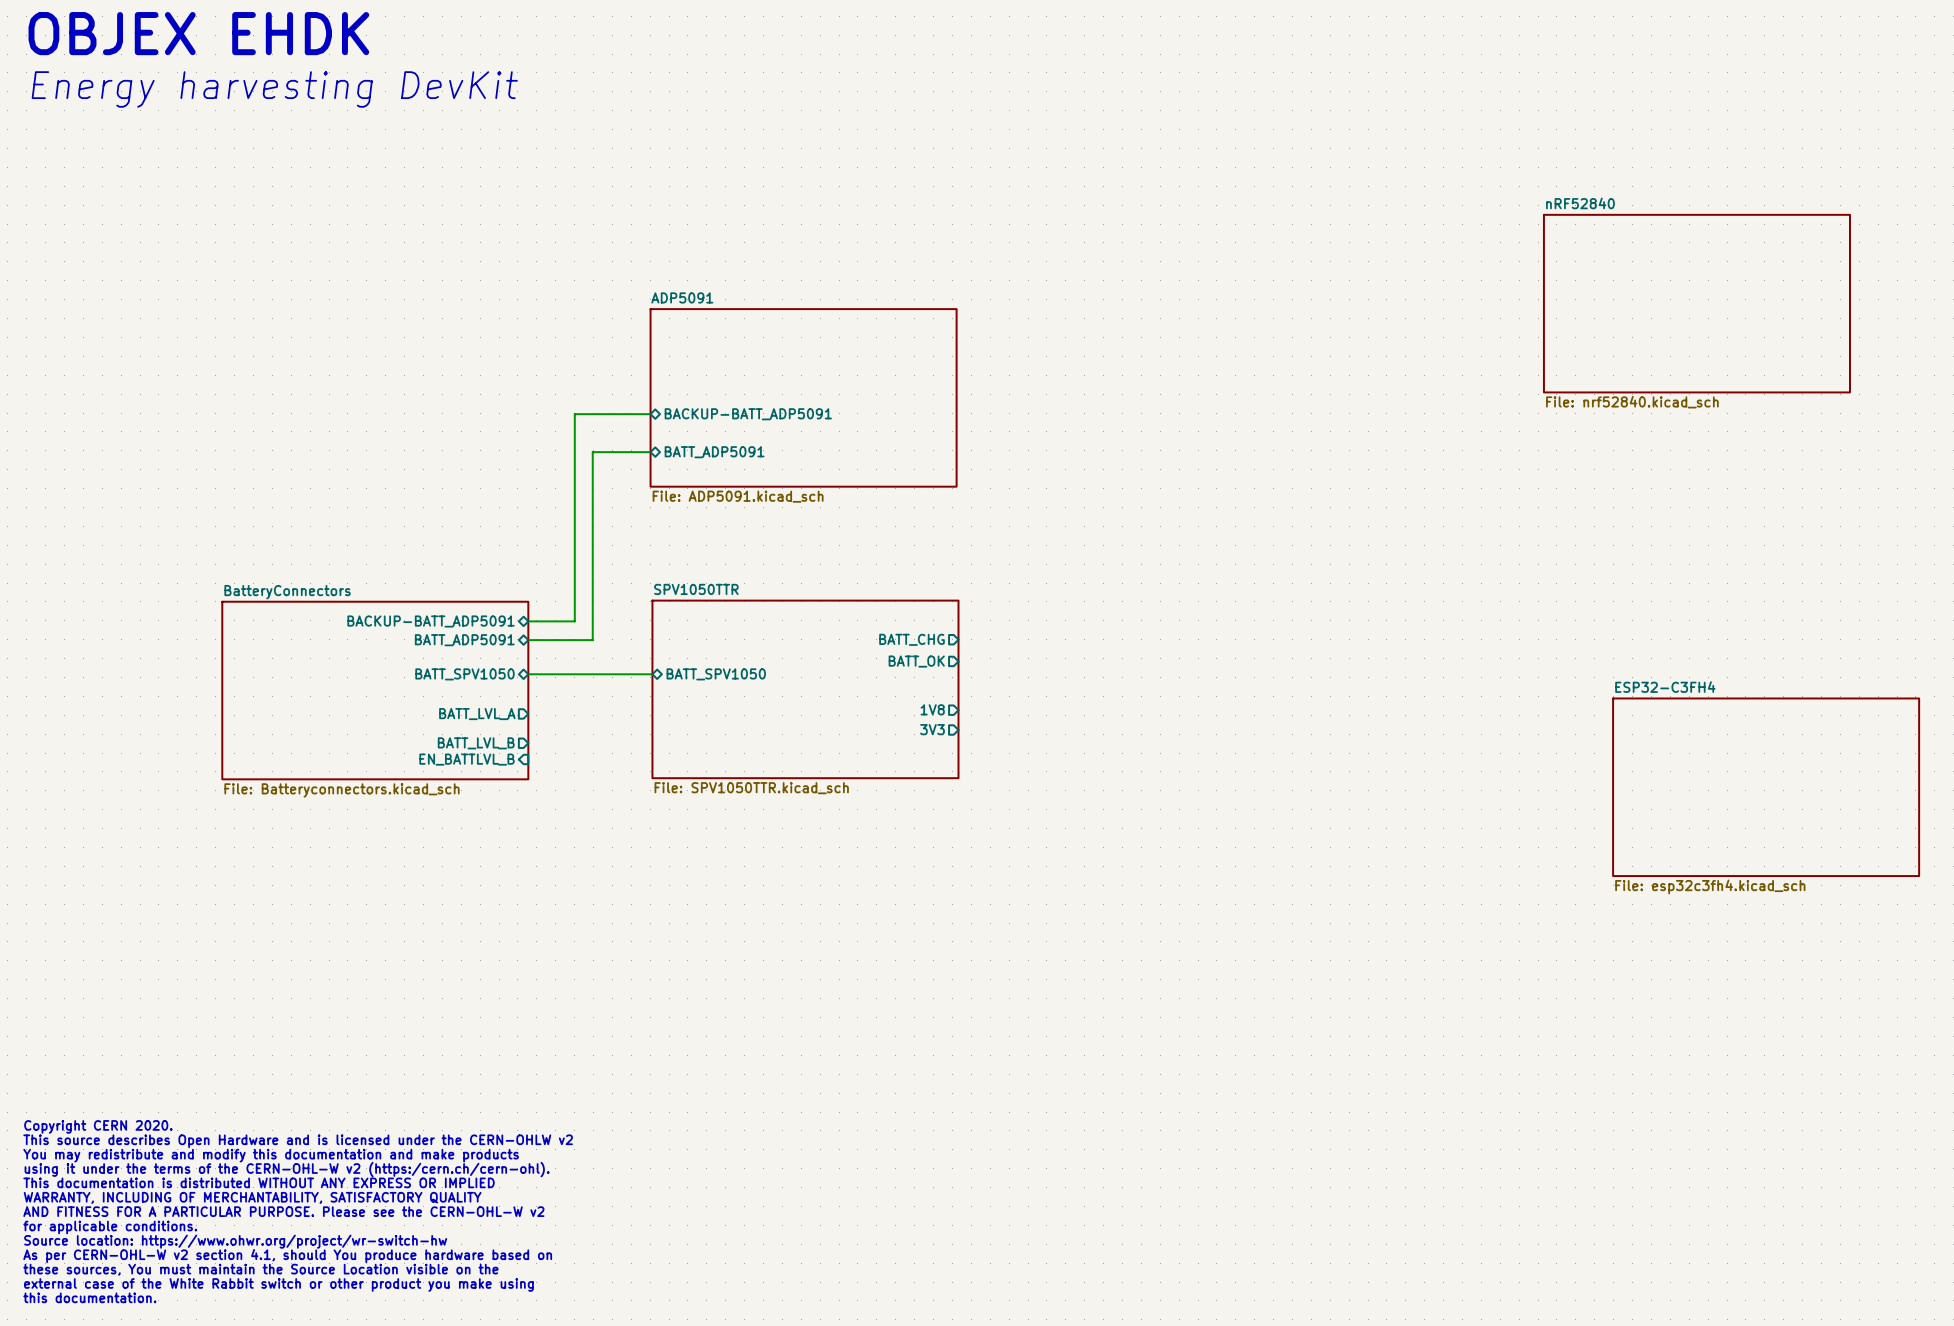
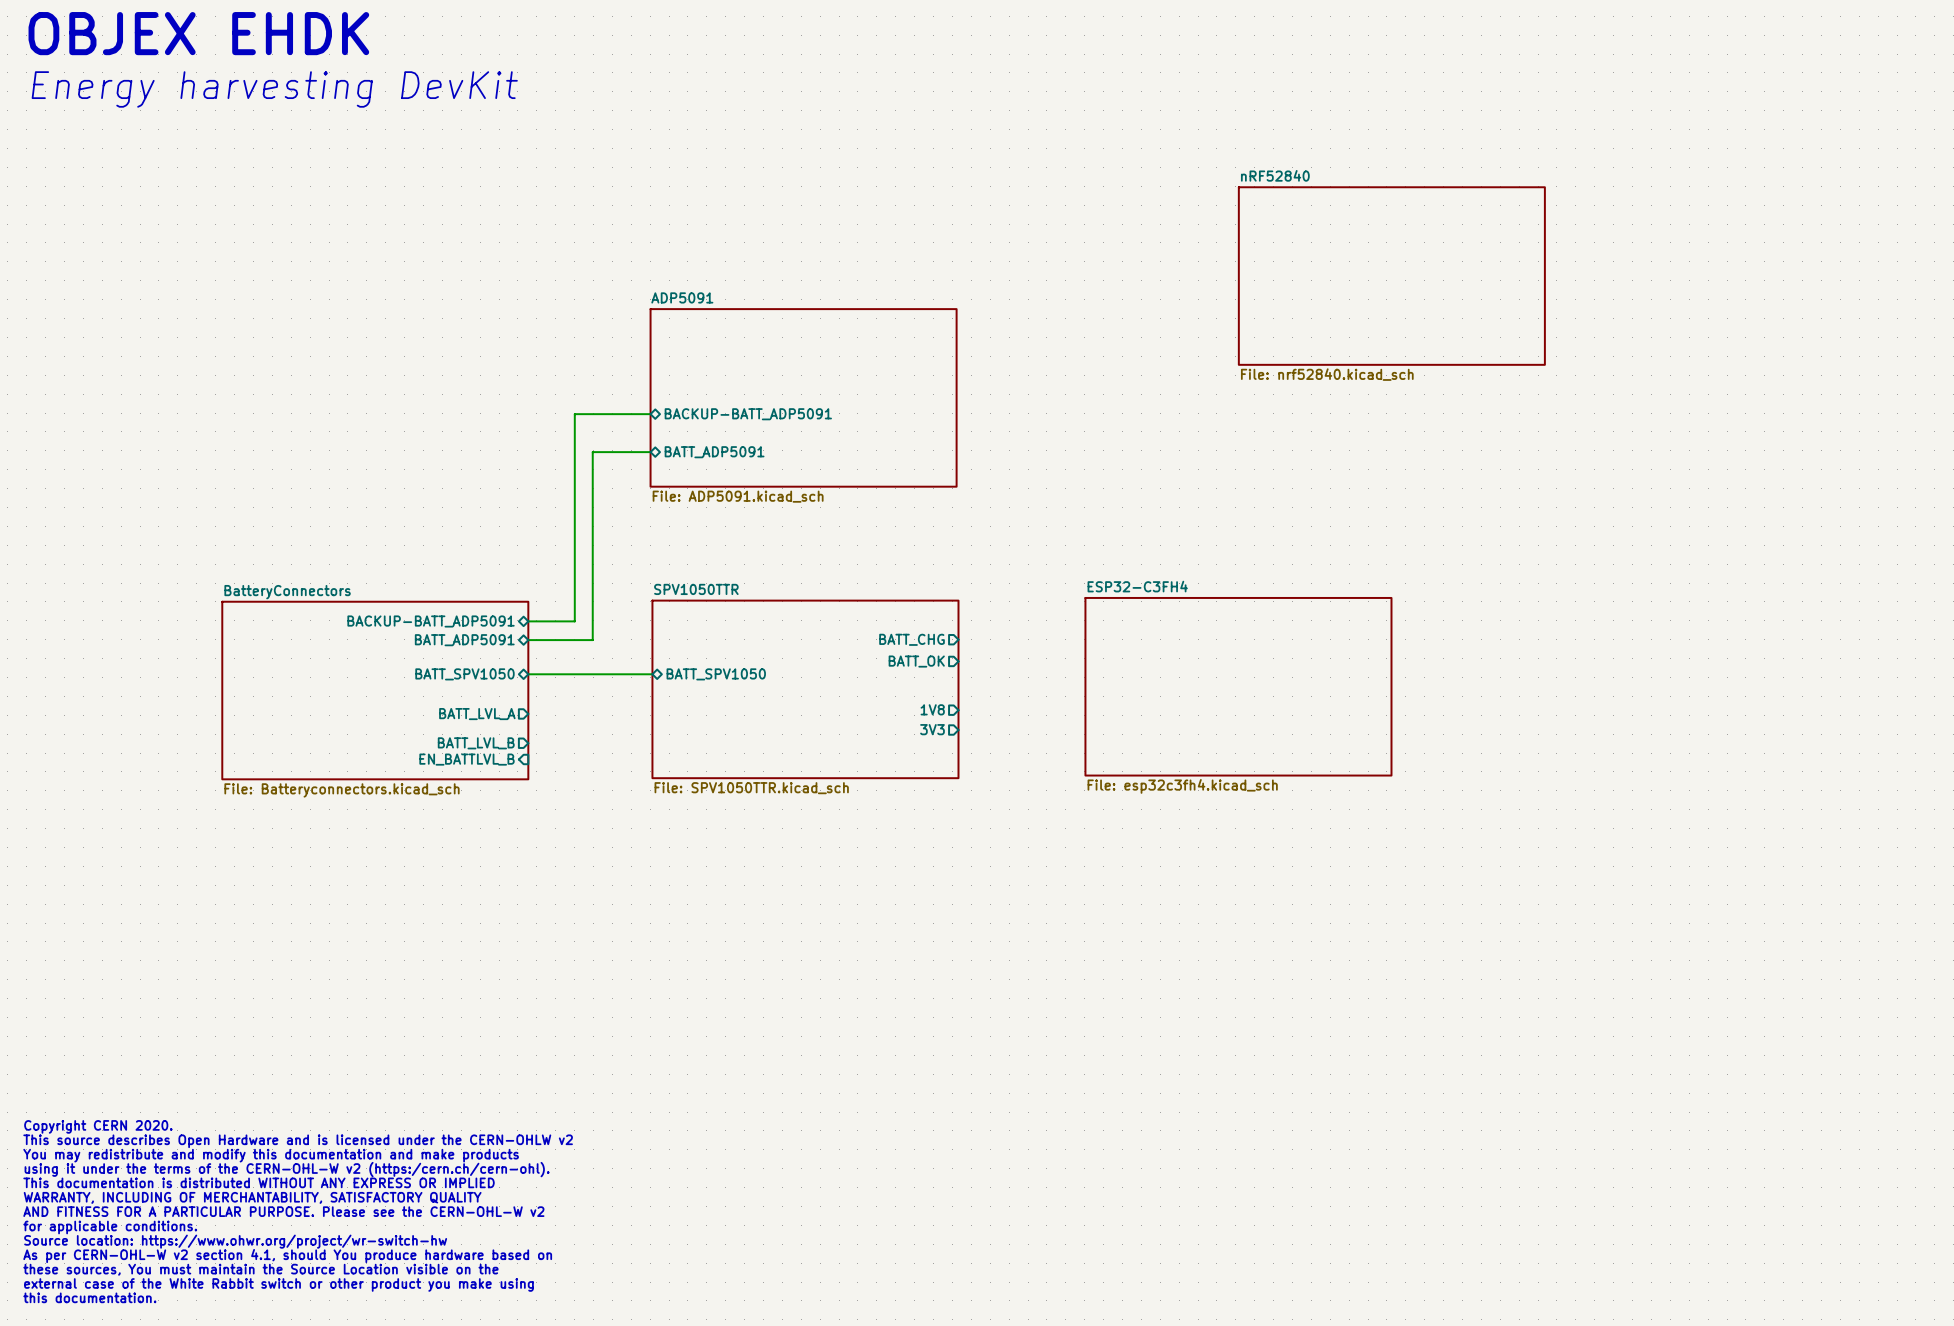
sheet nRF52840 position: (1696, 303) -> (1391, 276)
sheet ESP32-C3FH4 position: (1766, 787) -> (1238, 686)

